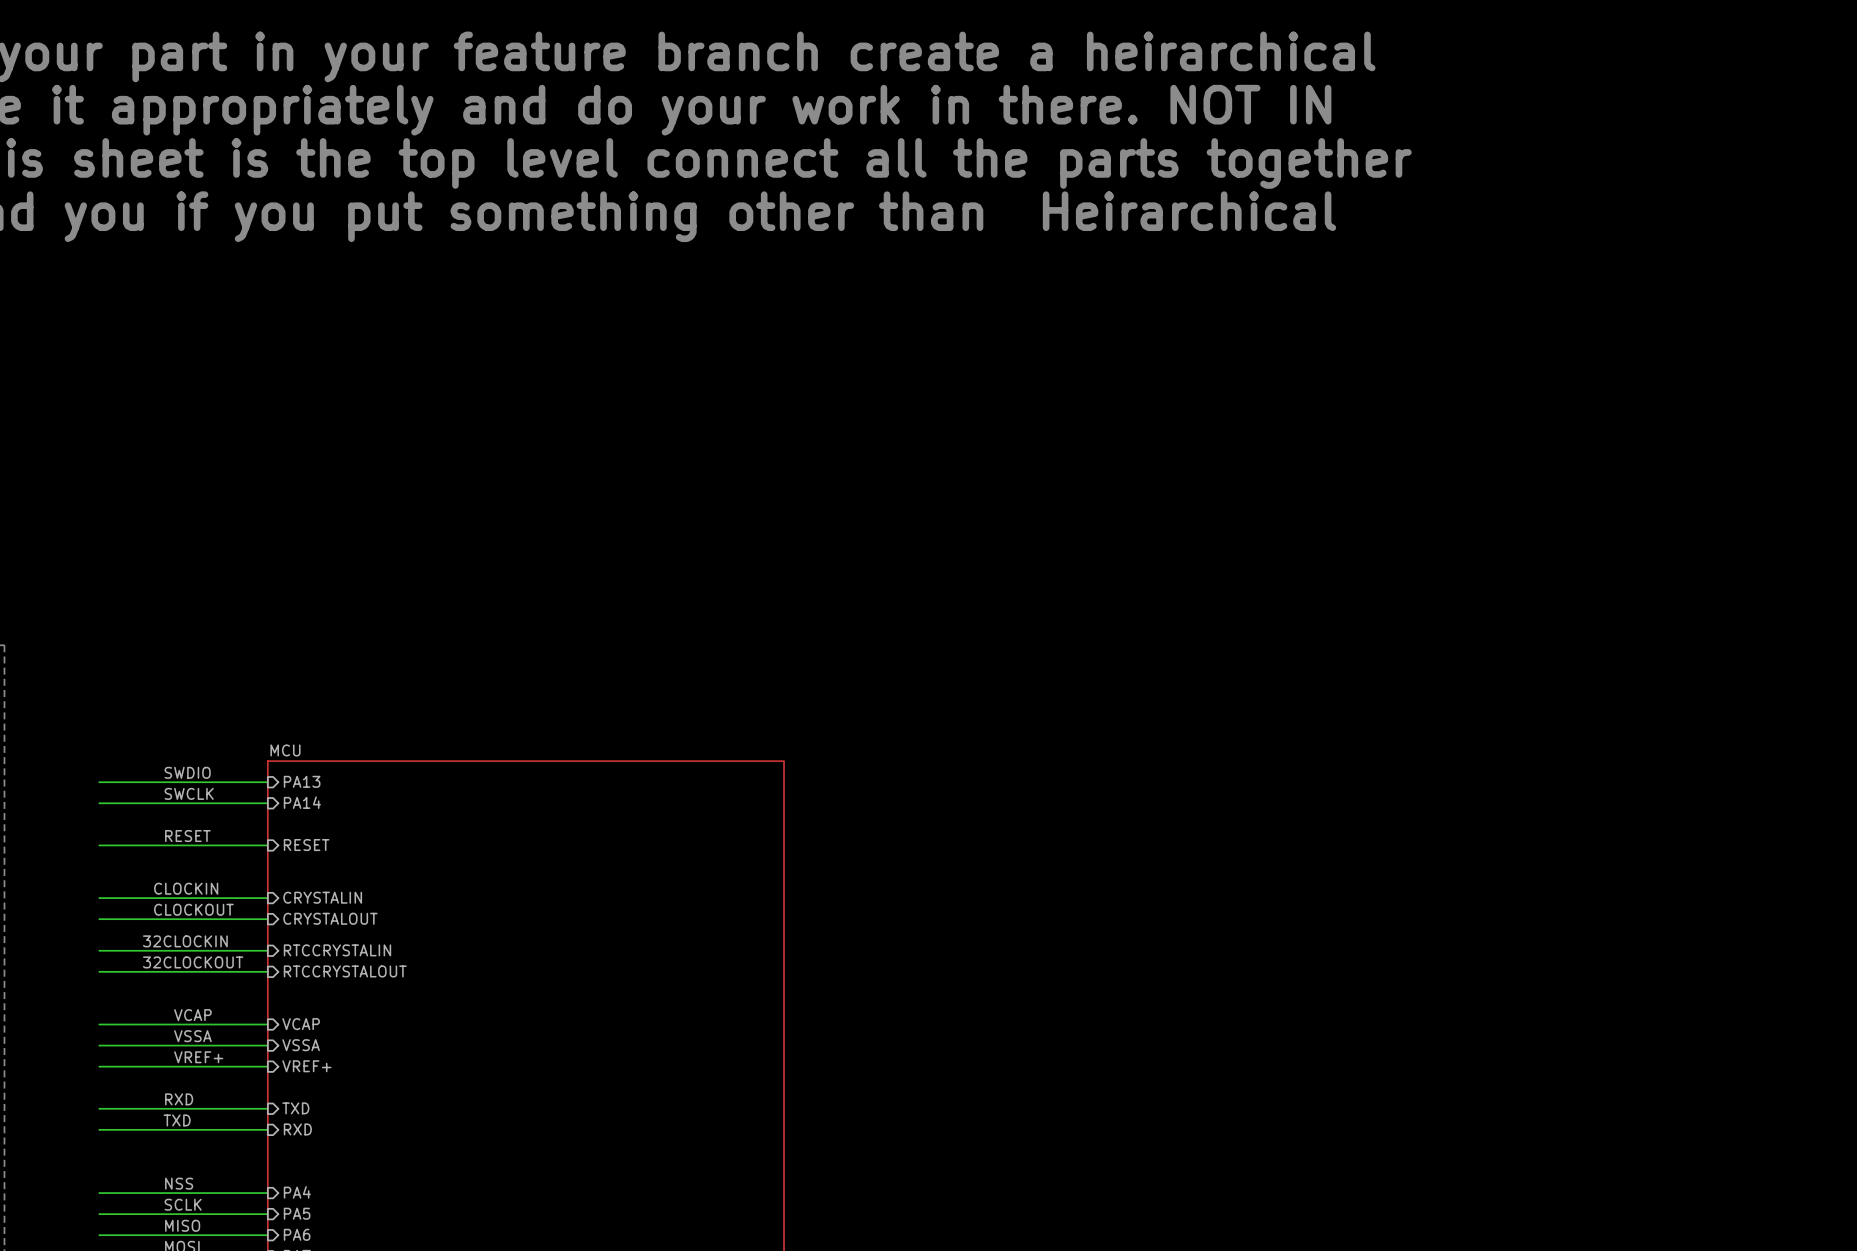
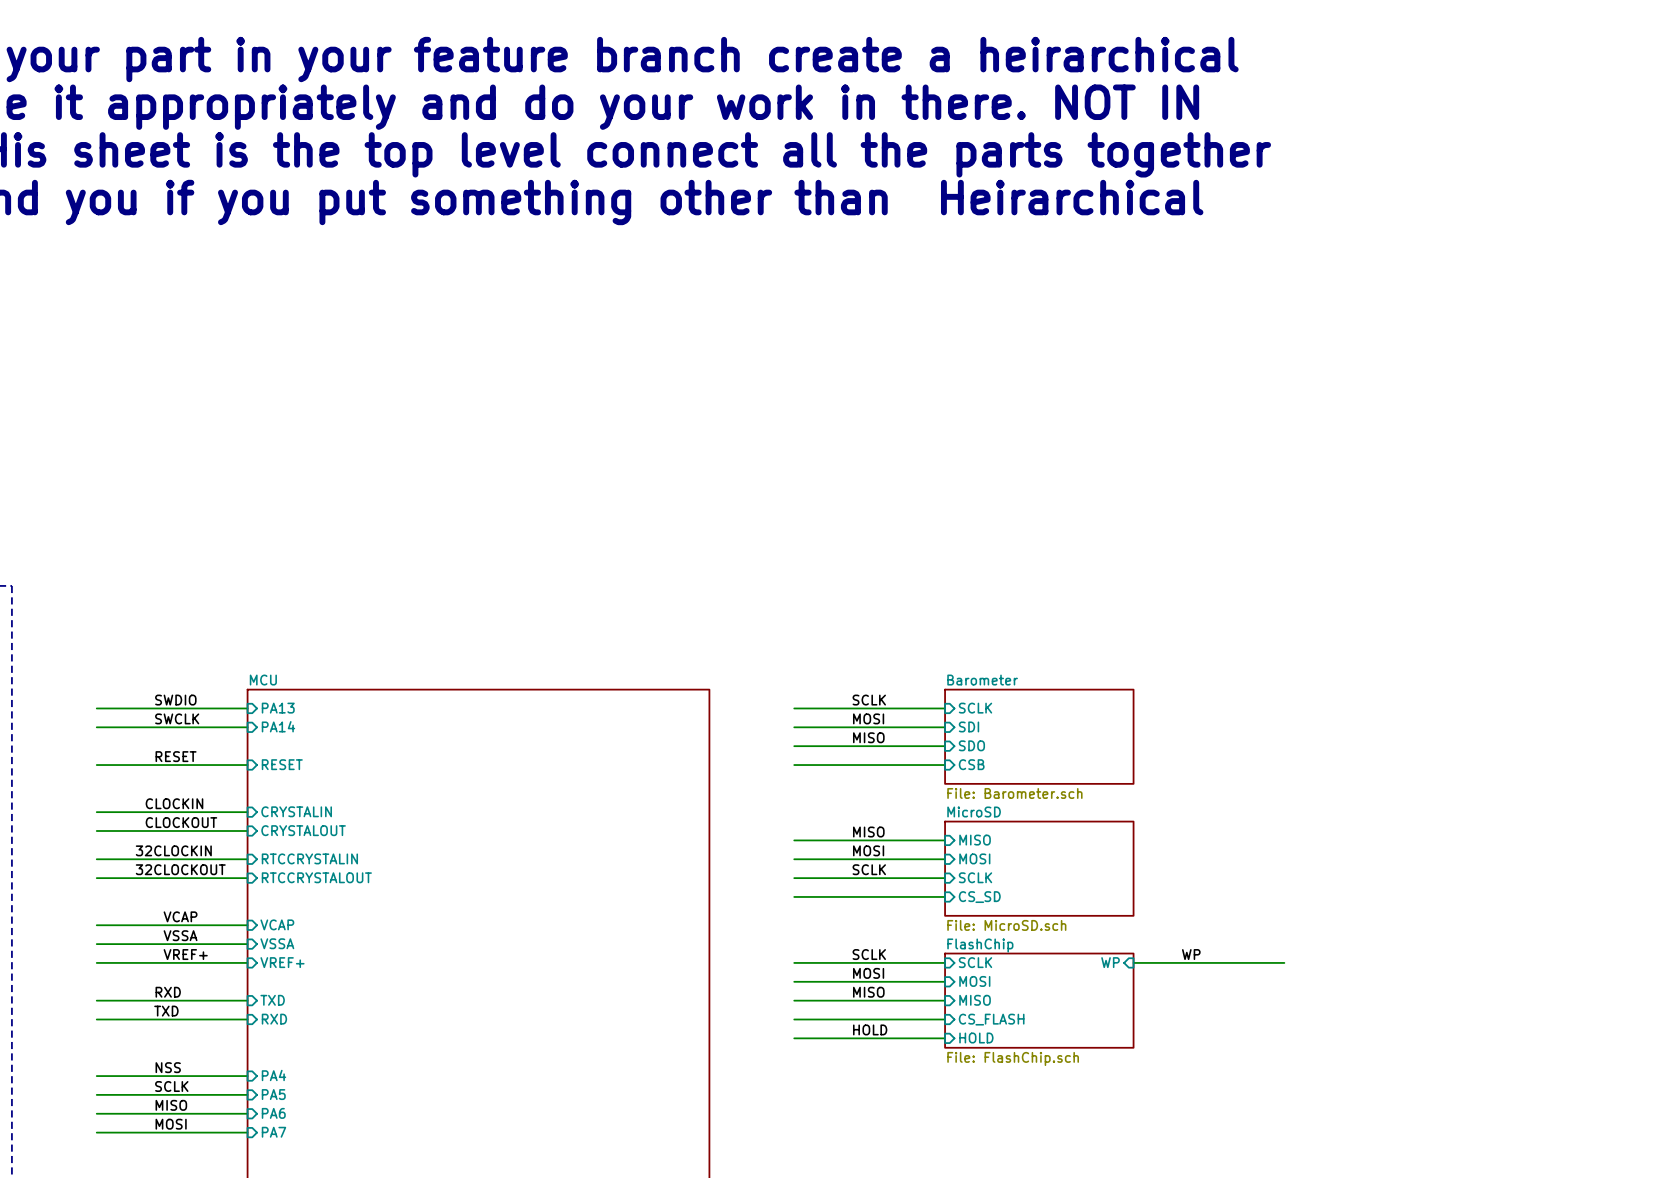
label: none -> SCLK (869, 700)
sheet pin: none -> SCLK (975, 708)
wire: none -> (794, 708) (945, 708)
label: none -> MOSI (868, 718)
sheet pin: none -> SDI (968, 726)
wire: none -> (794, 727) (945, 727)
sheet Barometer: none -> File: Barometer.sch (1039, 736)
label: none -> MISO (868, 737)
sheet pin: none -> SDO (971, 745)
wire: none -> (794, 746) (945, 746)
wire: none -> (794, 765) (945, 765)
sheet pin: none -> CSB (971, 764)
label: none -> MISO (868, 832)
wire: none -> (794, 840) (945, 840)
sheet pin: none -> MISO (975, 840)
label: none -> MOSI (868, 850)
wire: none -> (794, 859) (945, 859)
sheet pin: none -> MOSI (974, 858)
sheet MicroSD: none -> File: MicroSD.sch (1039, 868)
label: none -> SCLK (869, 869)
wire: none -> (794, 878) (945, 878)
sheet pin: none -> SCLK (975, 877)
wire: none -> (794, 896) (945, 896)
sheet pin: none -> CS_SD (979, 897)
label: none -> SCLK (869, 954)
label: none -> WP (1191, 954)
wire: none -> (794, 962) (945, 962)
sheet pin: none -> SCLK (975, 962)
sheet pin: none -> WP (1110, 962)
wire: none -> (1133, 962) (1284, 962)
label: none -> MOSI (868, 973)
wire: none -> (794, 981) (945, 981)
sheet pin: none -> MOSI (974, 981)
label: none -> MISO (868, 992)
wire: none -> (794, 1000) (945, 1000)
sheet pin: none -> MISO (975, 1000)
sheet FlashChip: none -> File: FlashChip.sch (1039, 1000)
wire: none -> (794, 1019) (945, 1019)
sheet pin: none -> CS_FLASH (991, 1019)
label: none -> HOLD (870, 1029)
wire: none -> (794, 1038) (945, 1038)
sheet pin: none -> HOLD (976, 1038)

